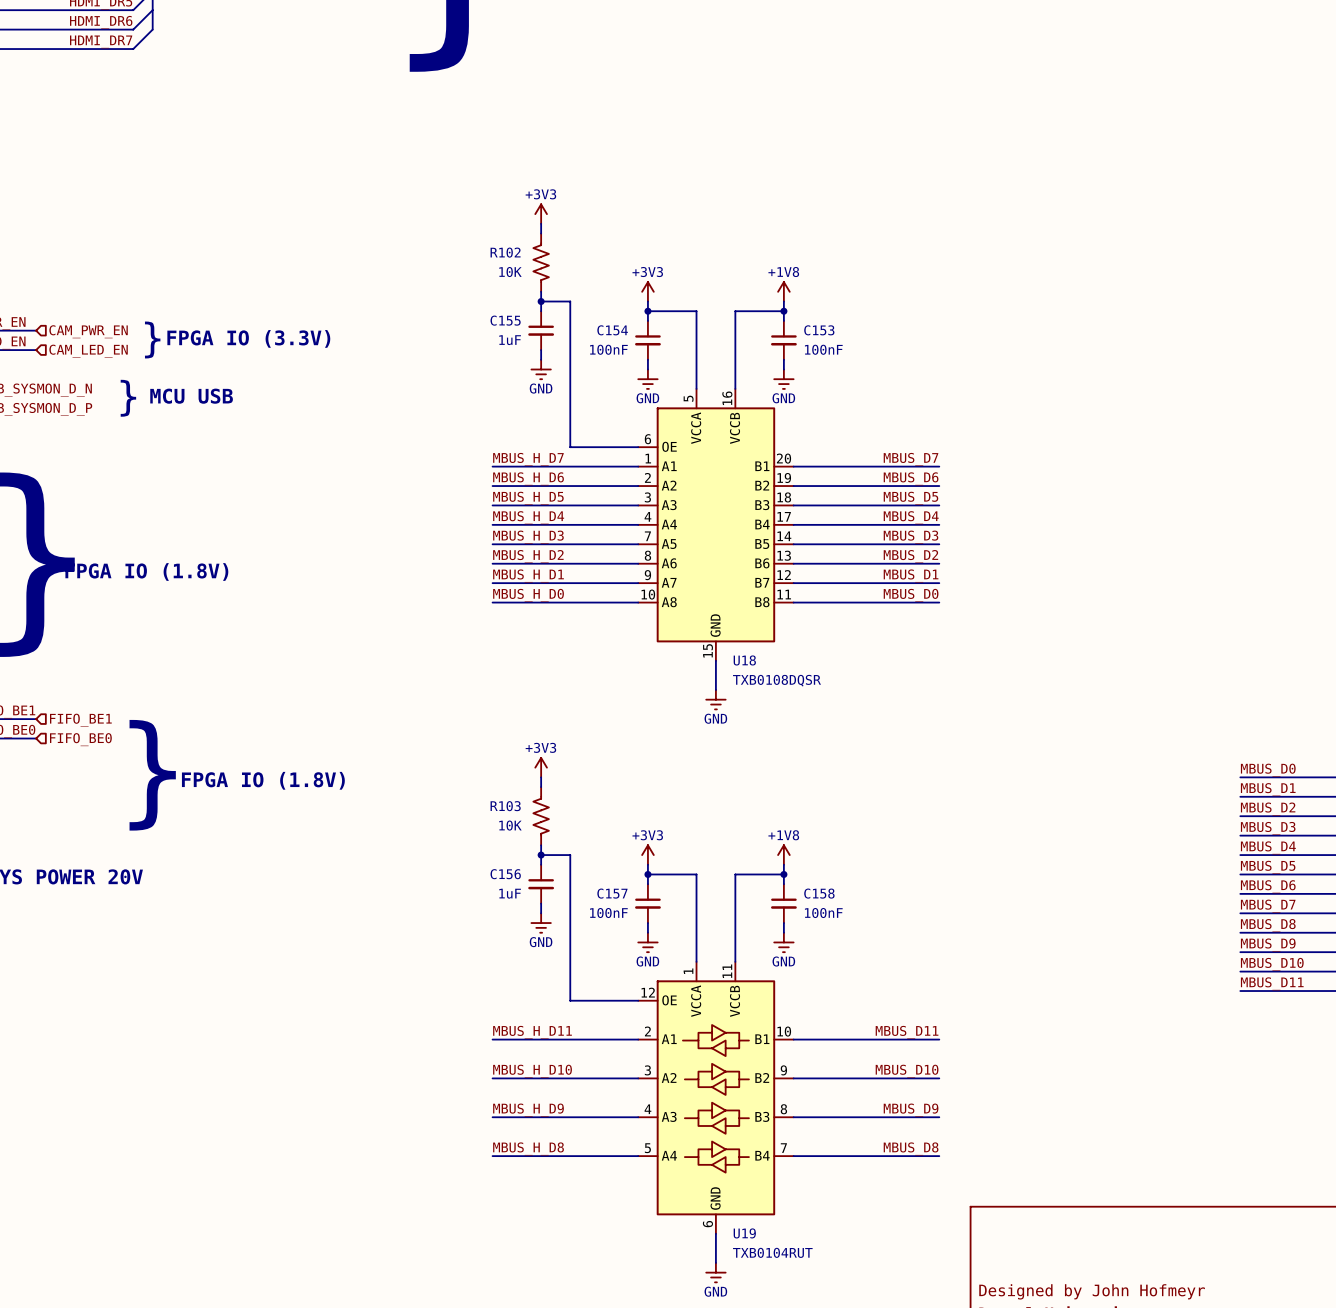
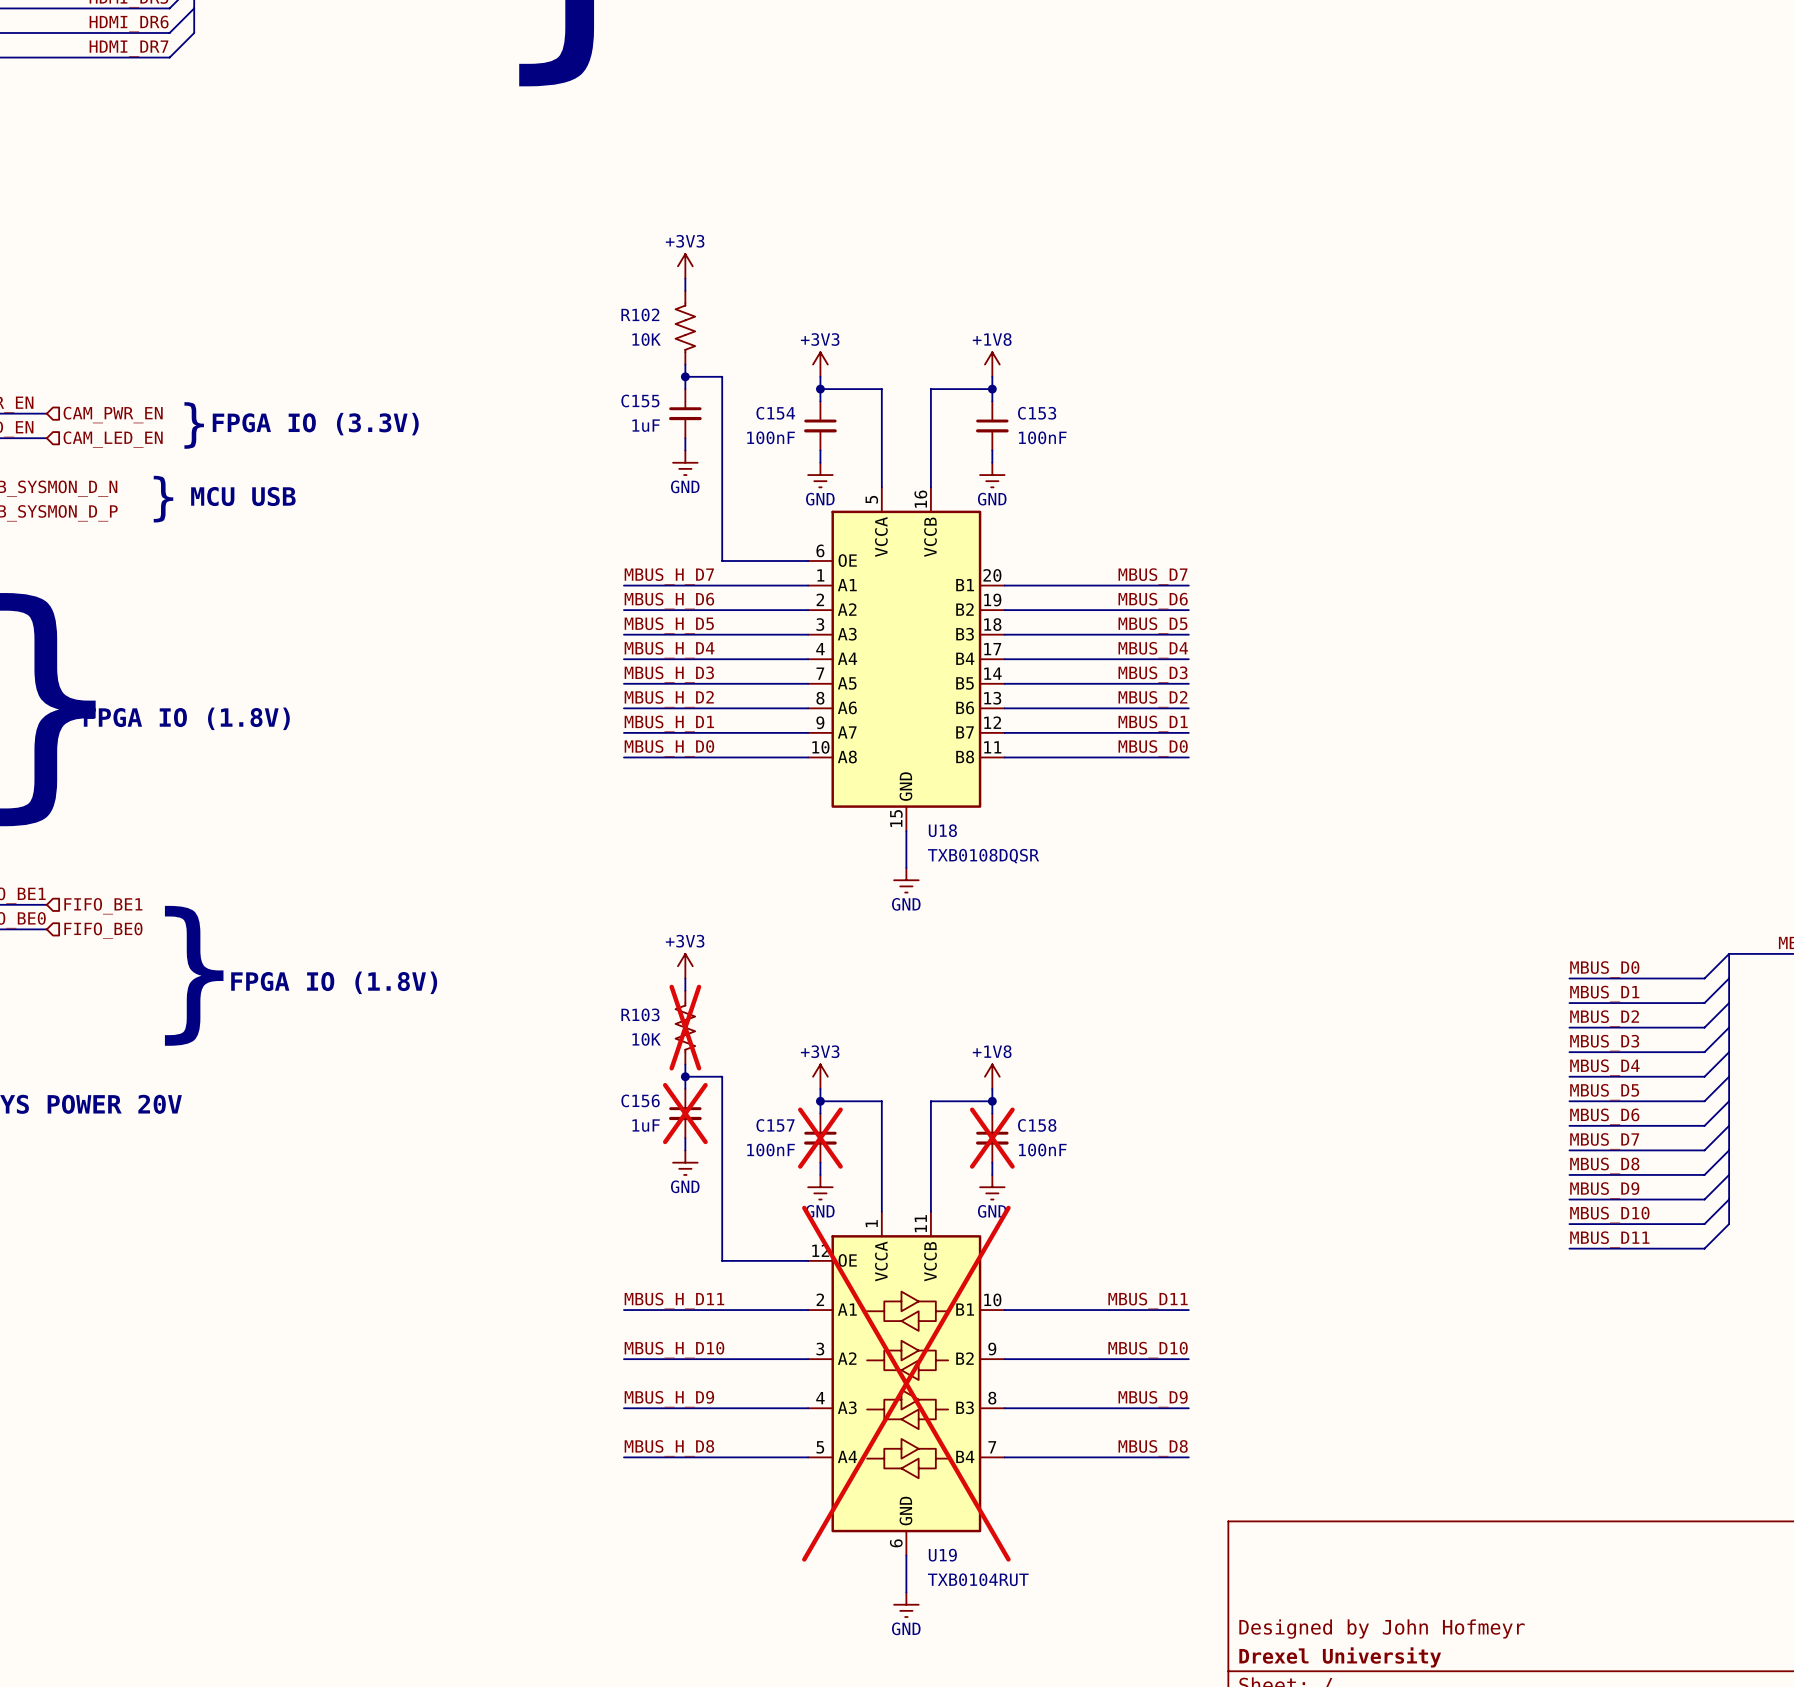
R103 do-not-place cross: none -> (685, 1027)
C156 do-not-place cross: none -> (685, 1113)
C157 do-not-place cross: none -> (820, 1138)
C158 do-not-place cross: none -> (992, 1138)
U19 do-not-place cross: none -> (906, 1383)

